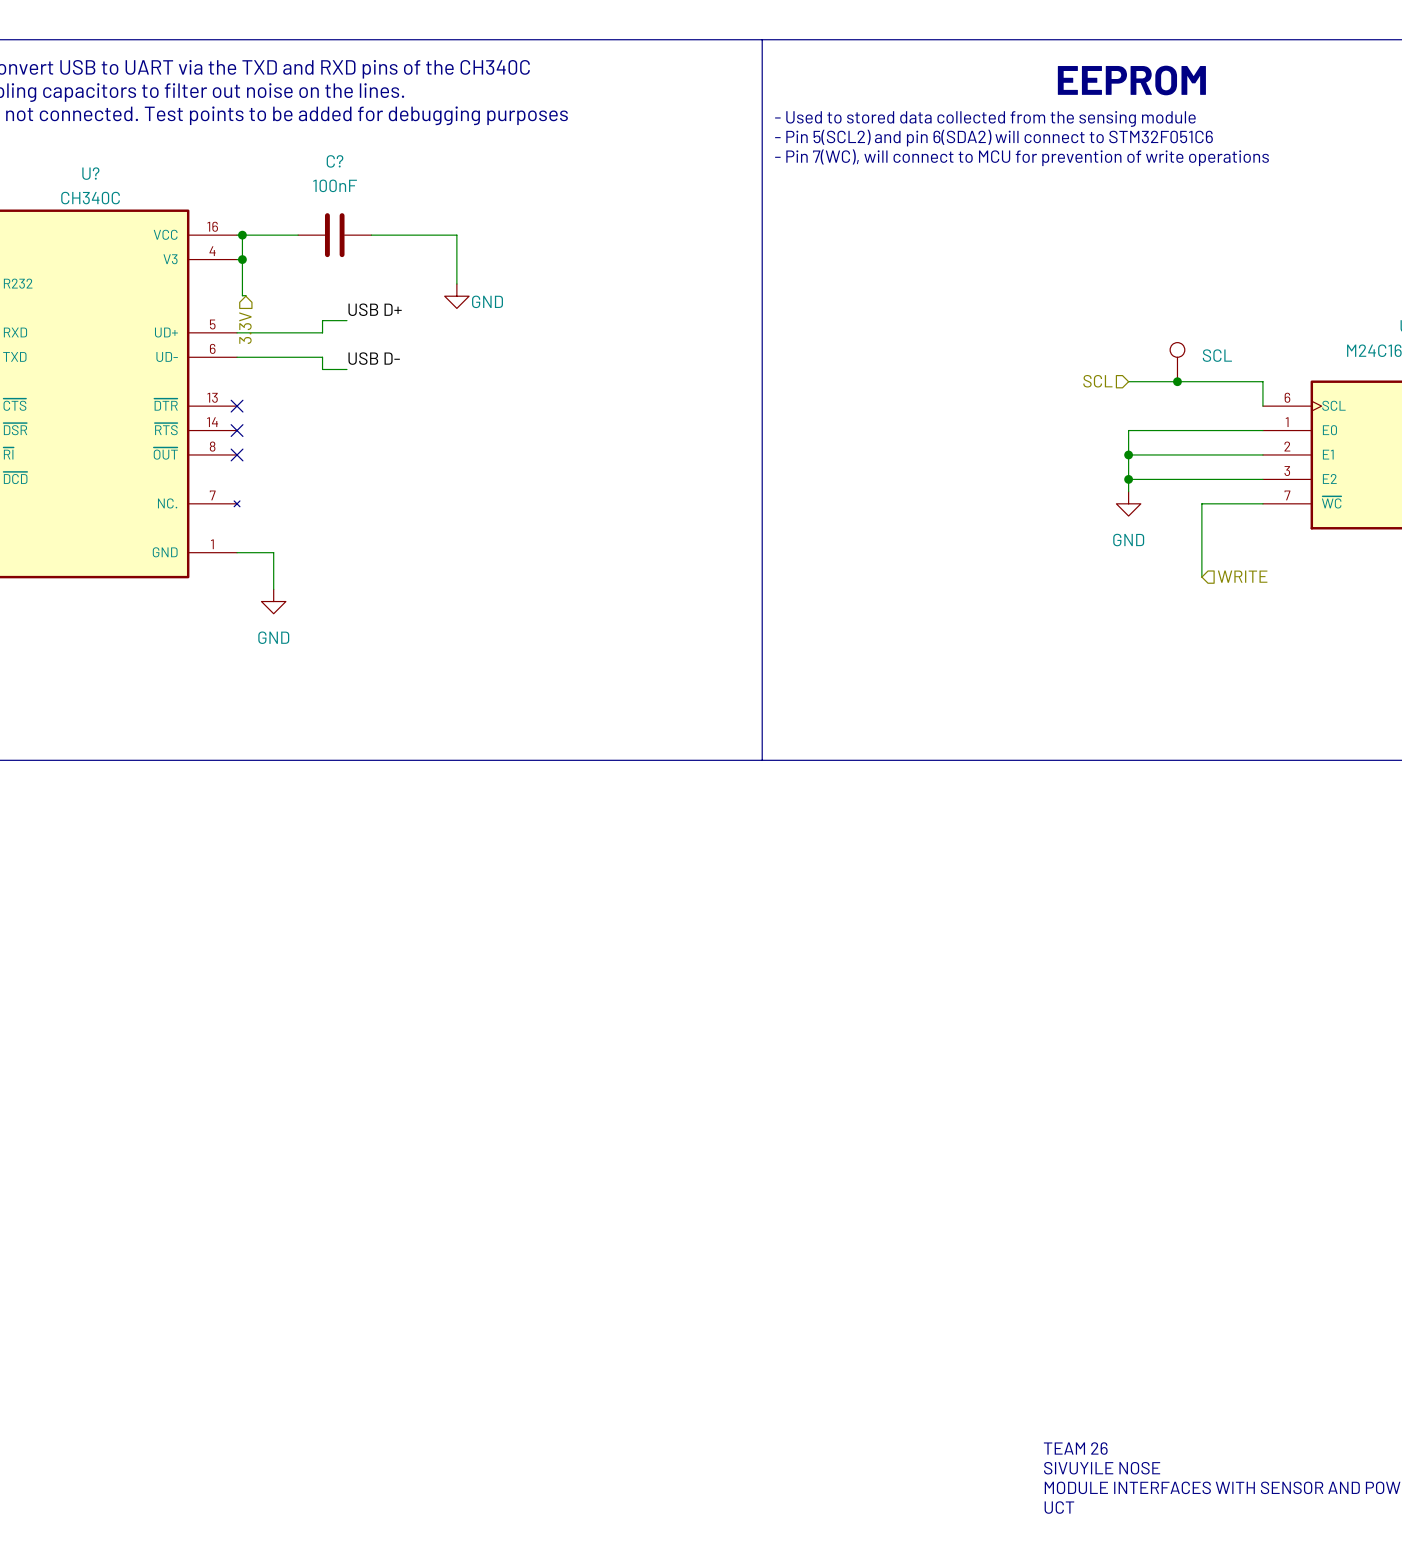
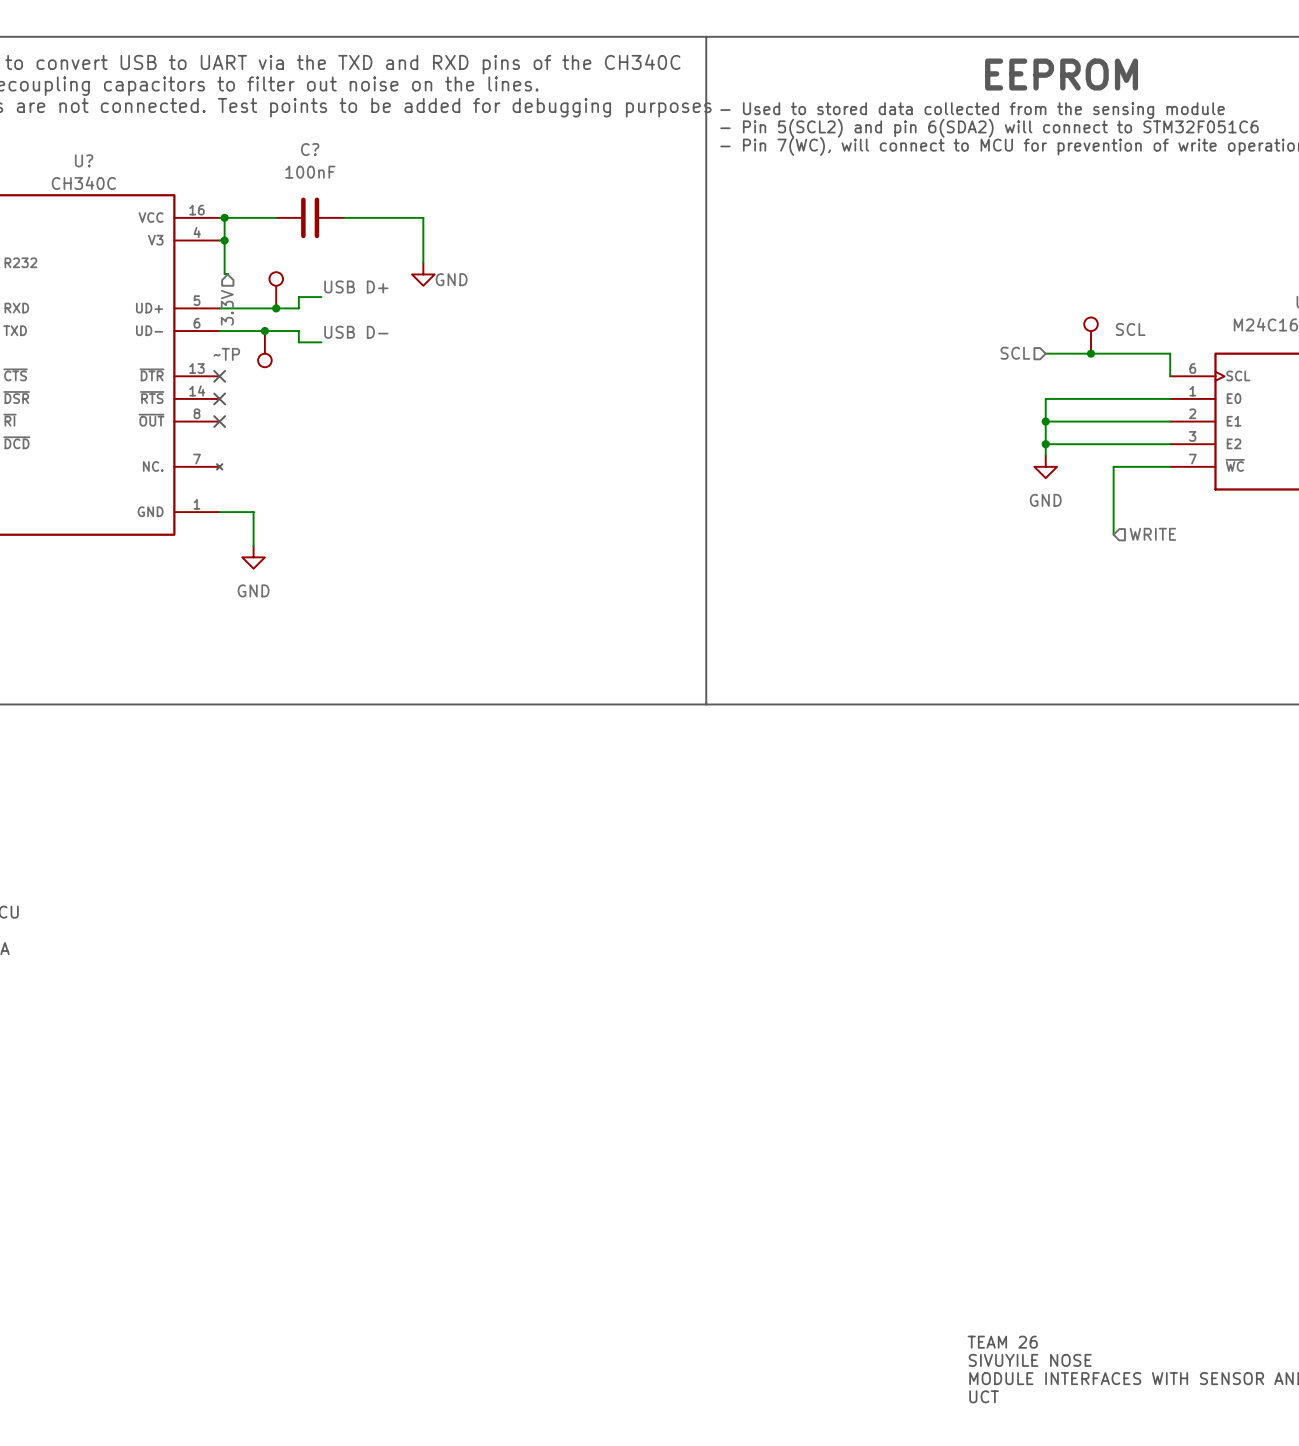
part: none -> (276, 290)
junction: none -> (276, 308)
junction: none -> (264, 331)
part: none -> ~TP (264, 349)

